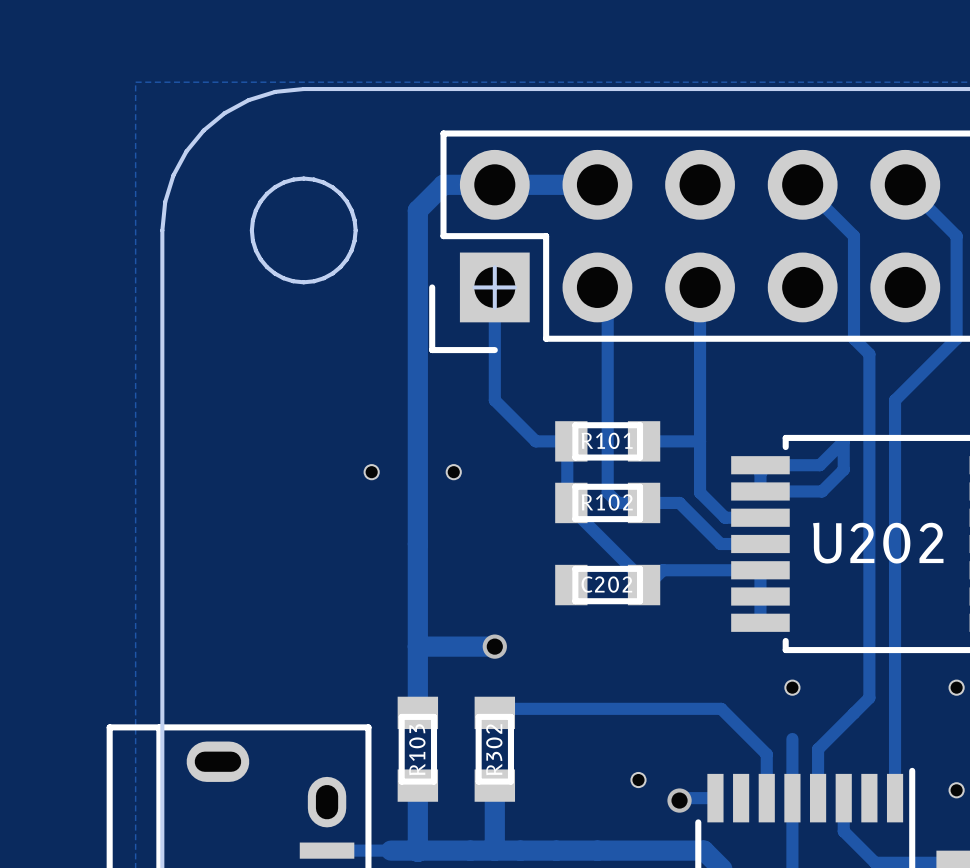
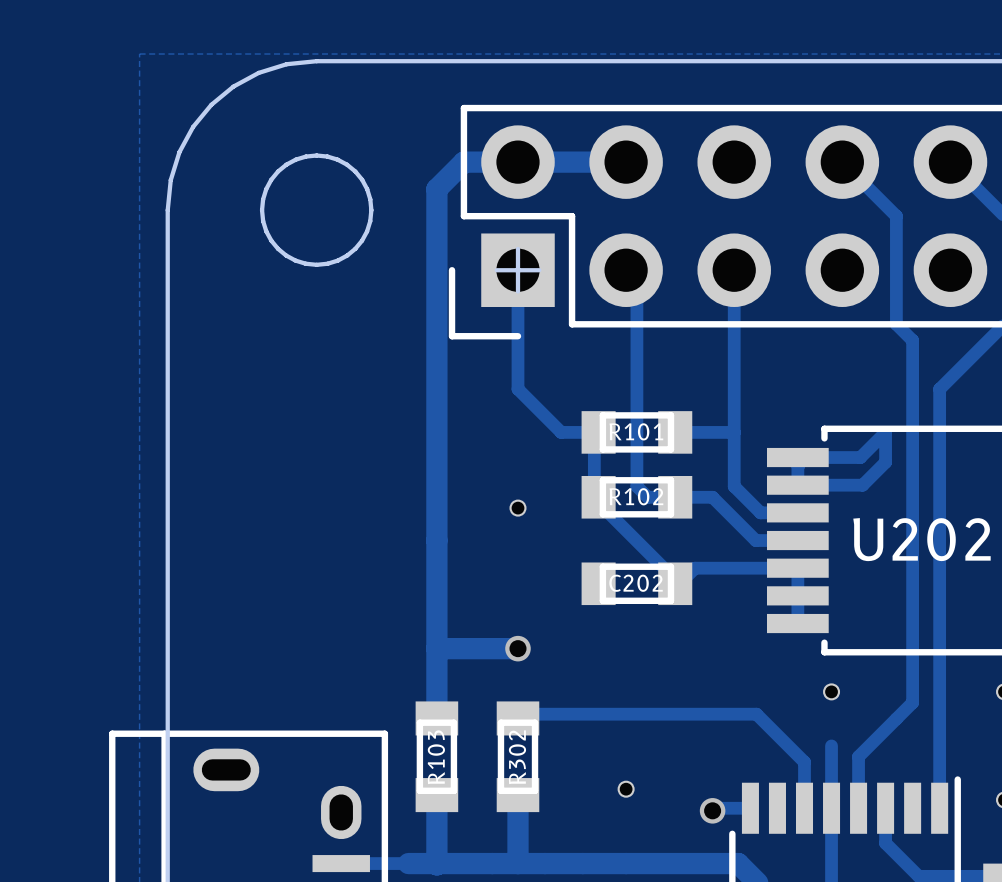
part: (371, 472) -> none
part position: (453, 472) -> (517, 508)
part position: (638, 780) -> (626, 789)

